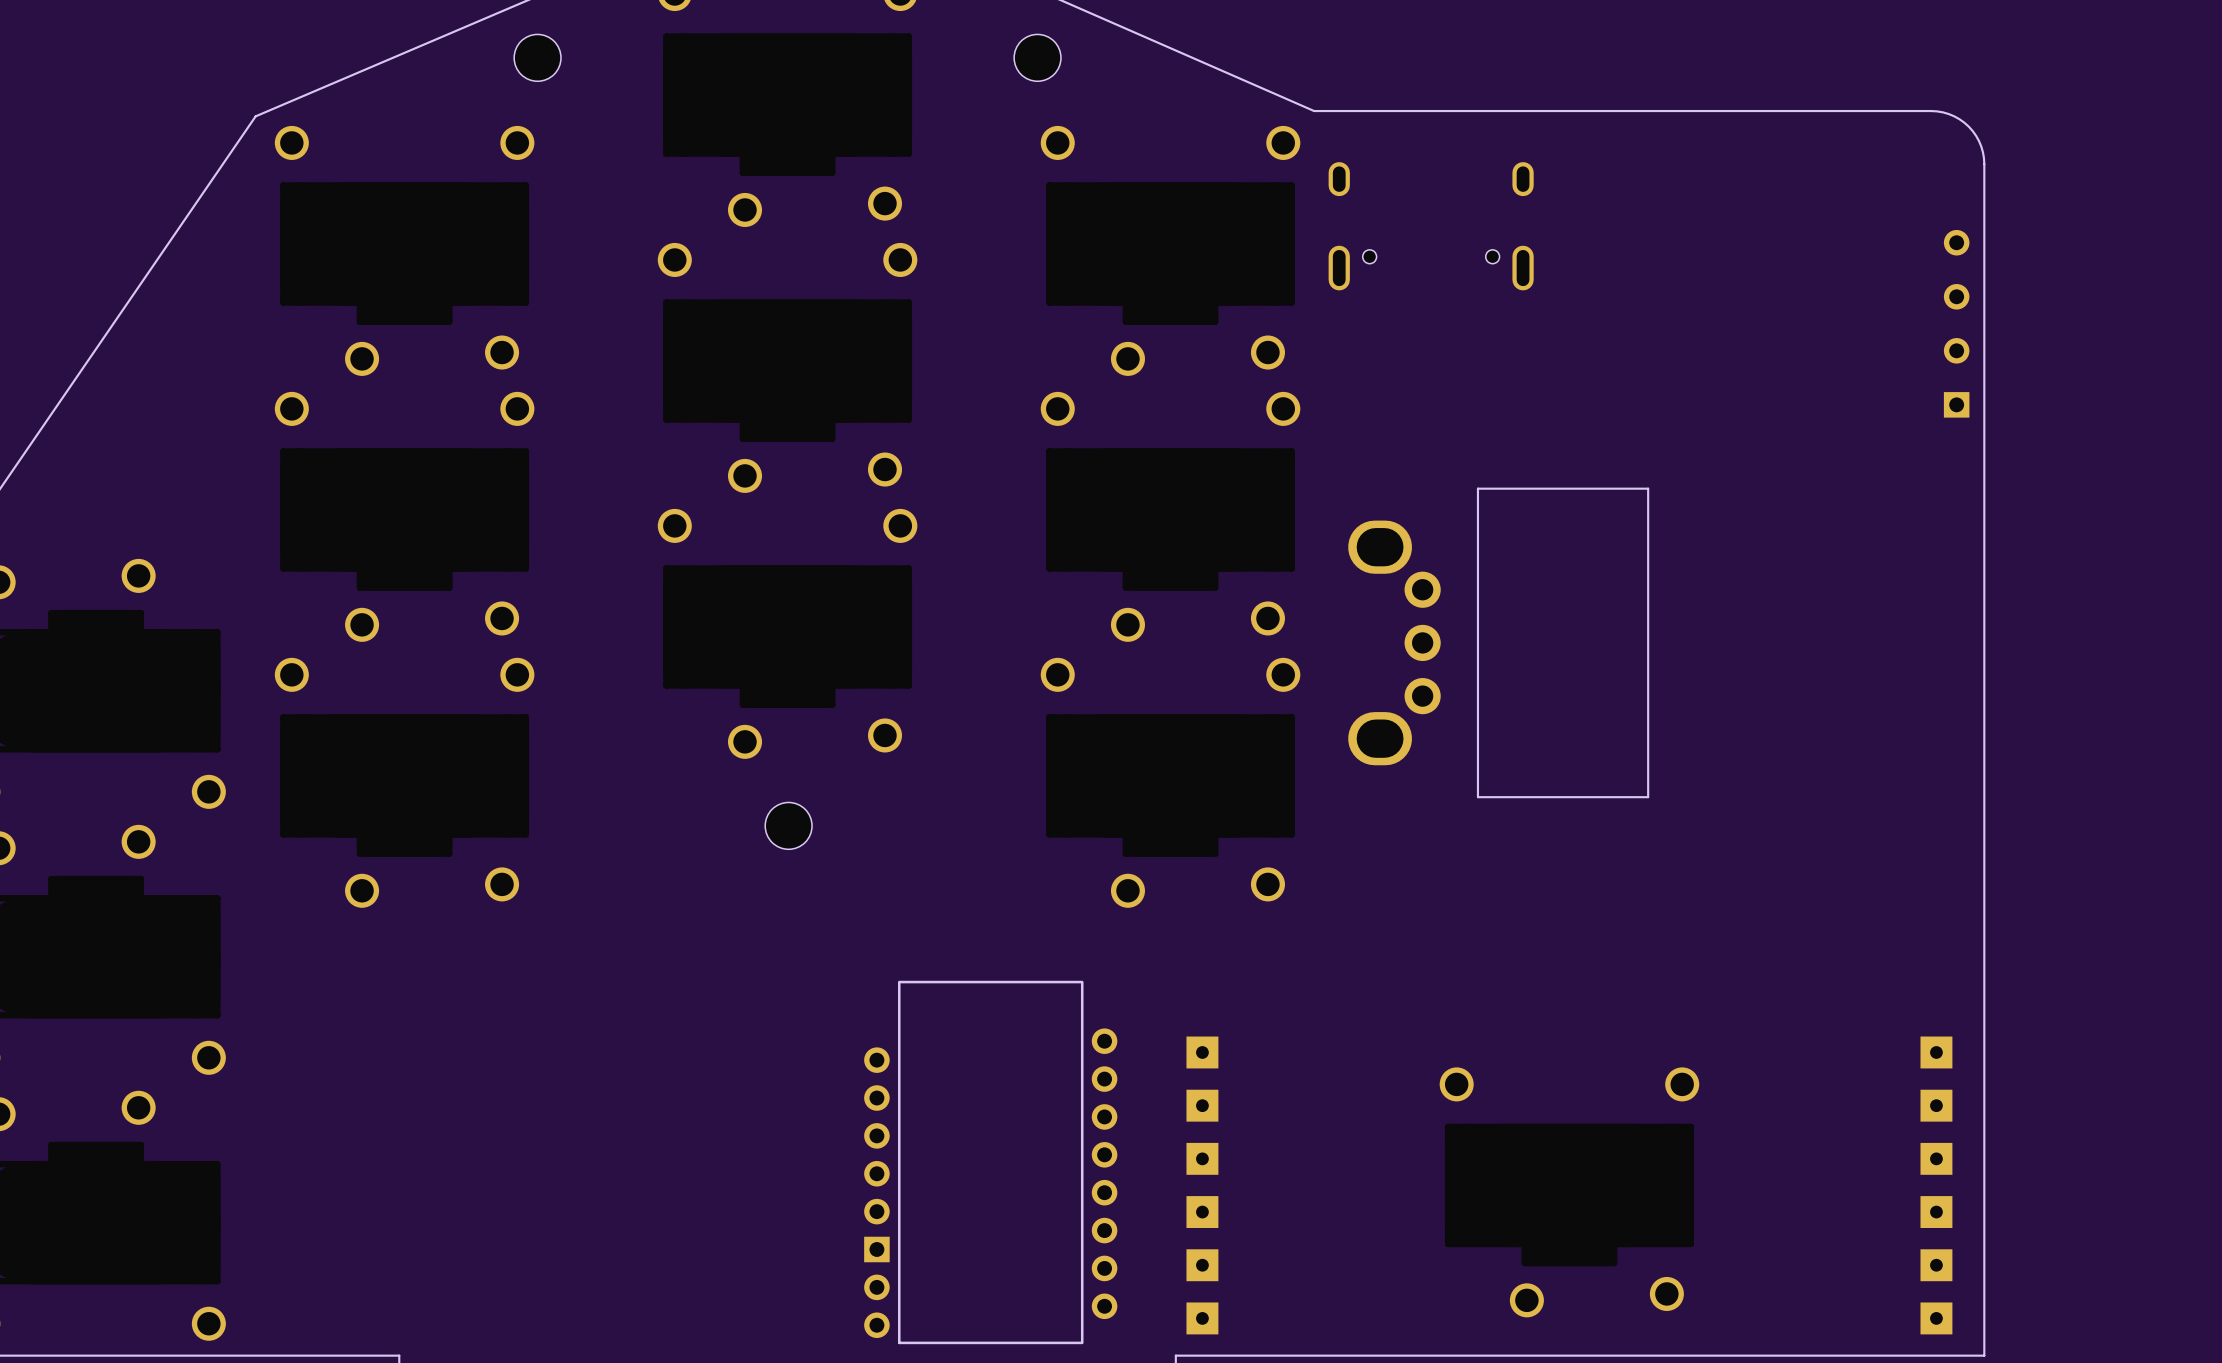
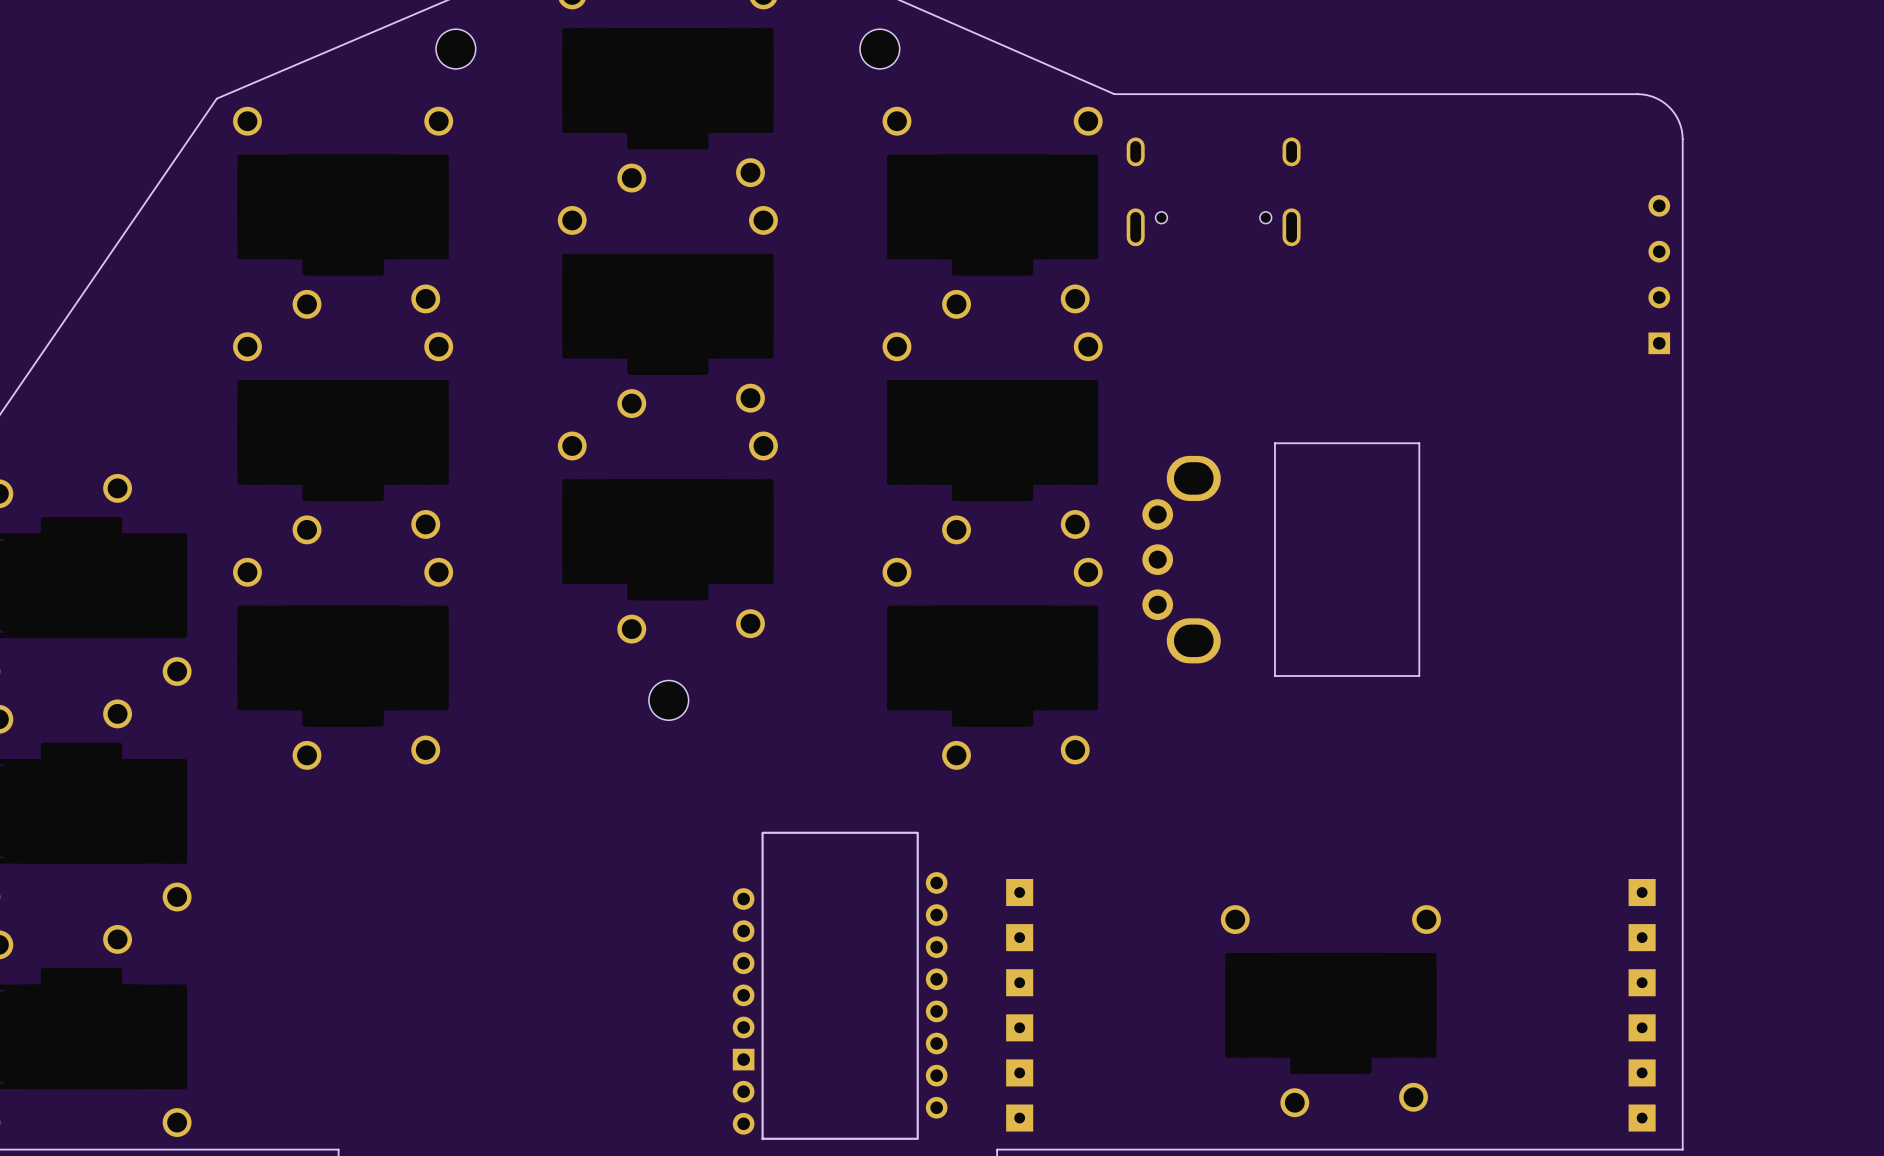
part rotation: 0° (1394, 642) -> 180° (1181, 559)
board edge: (1648, 797) (1648, 488) (1477, 488) (1477, 797) (1503, 797) -> (1397, 676) (1419, 676) (1419, 443) (1274, 443) (1274, 676)

